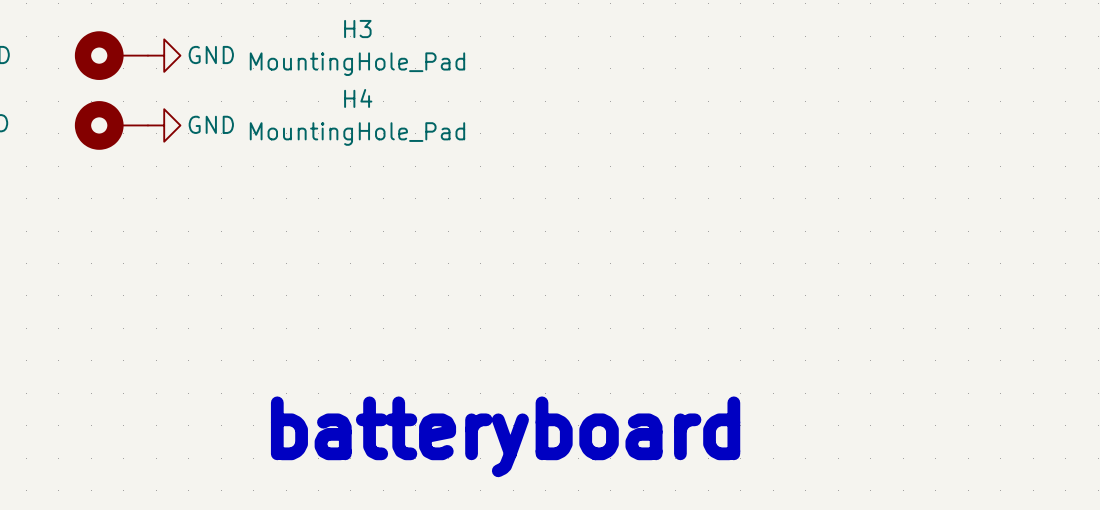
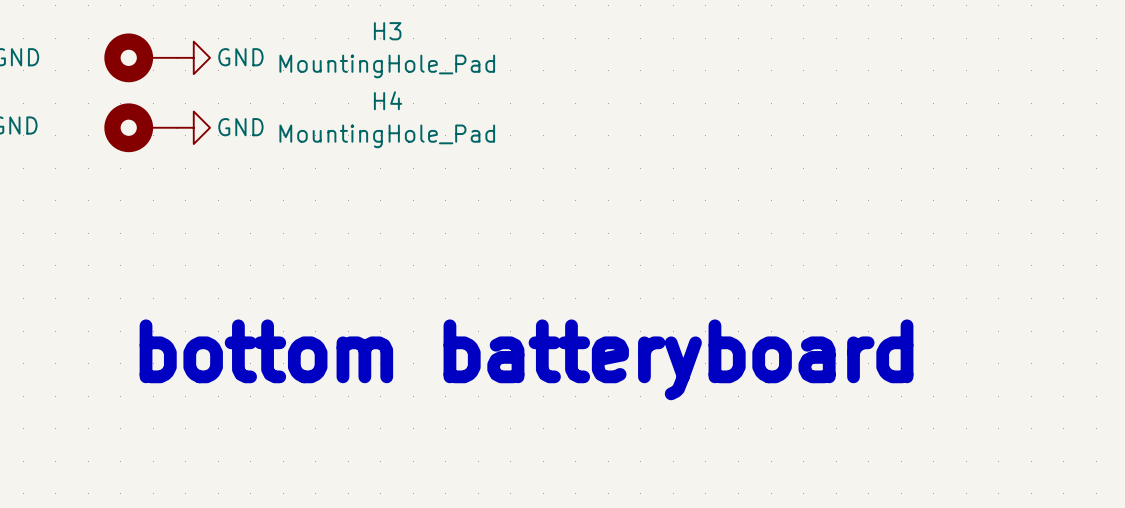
text: batteryboard (505, 436) -> bottom batteryboard (526, 359)

